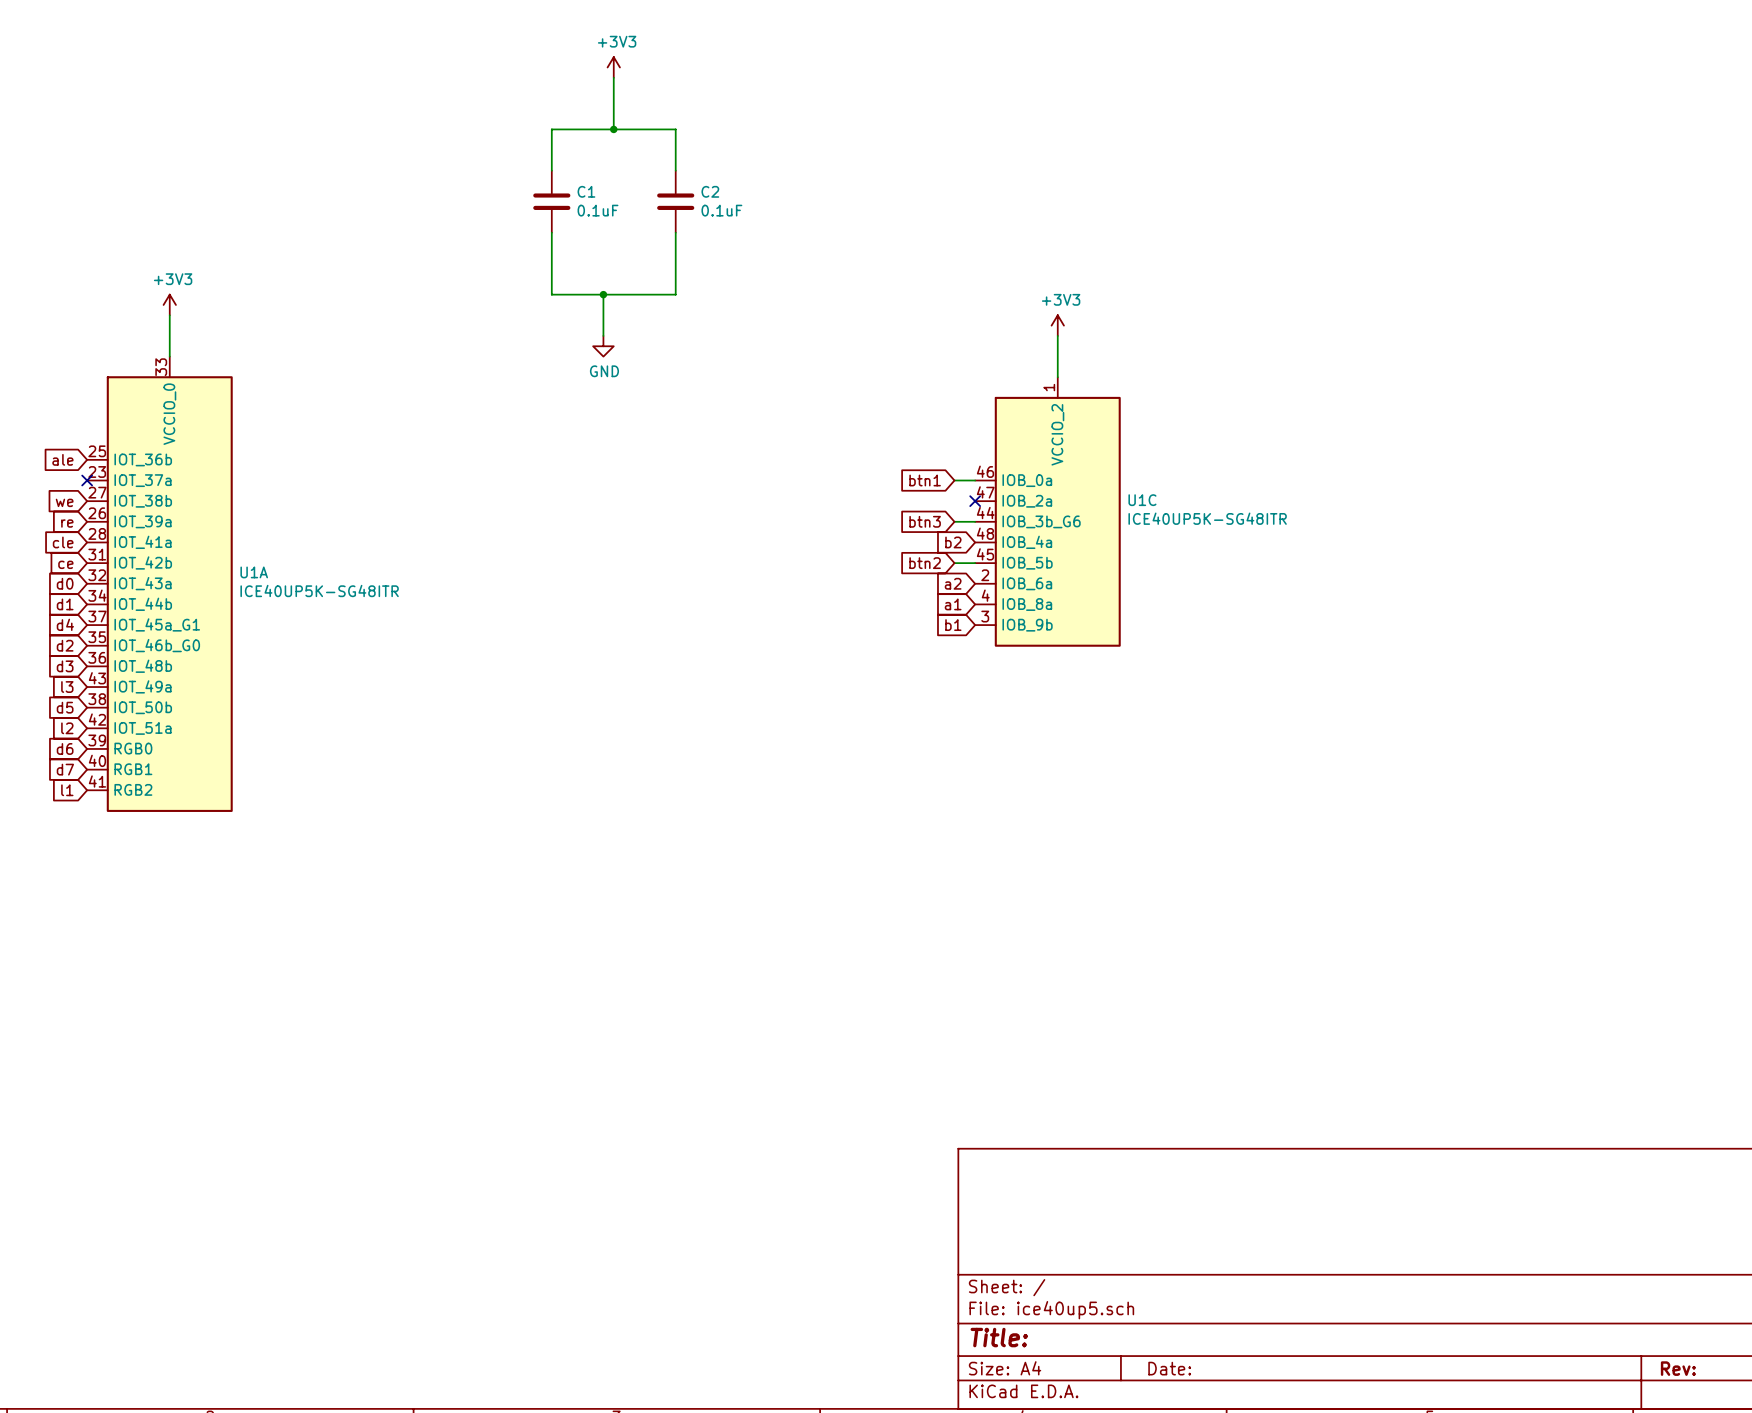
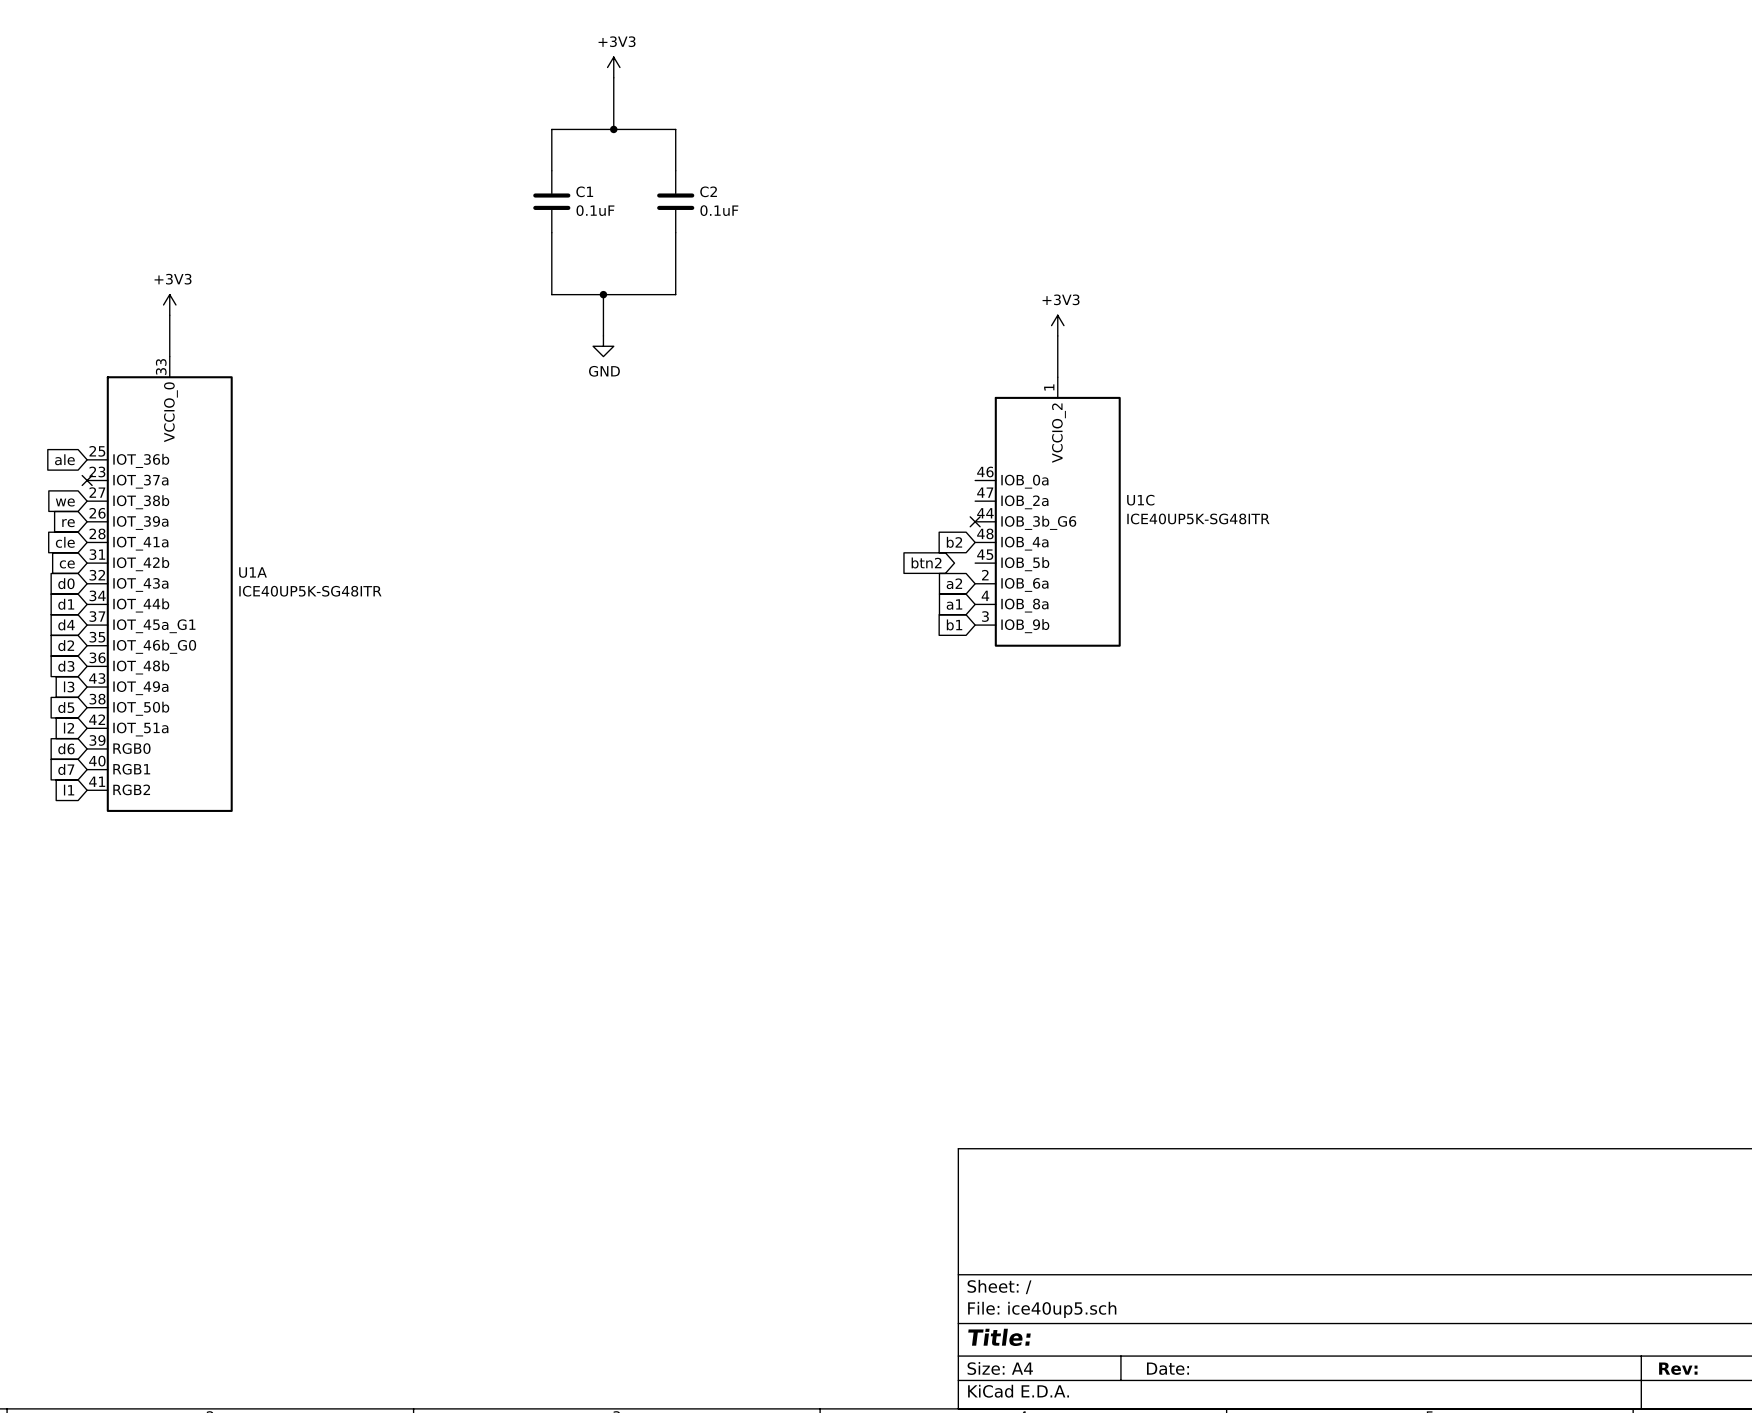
global label: btn1 (925, 480) -> none
wire: (954, 480) (975, 480) -> none
no-connect mark position: (975, 501) -> (975, 521)
global label: btn3 (925, 521) -> none
wire: (954, 521) (975, 521) -> none
wire: (954, 563) (975, 563) -> none

